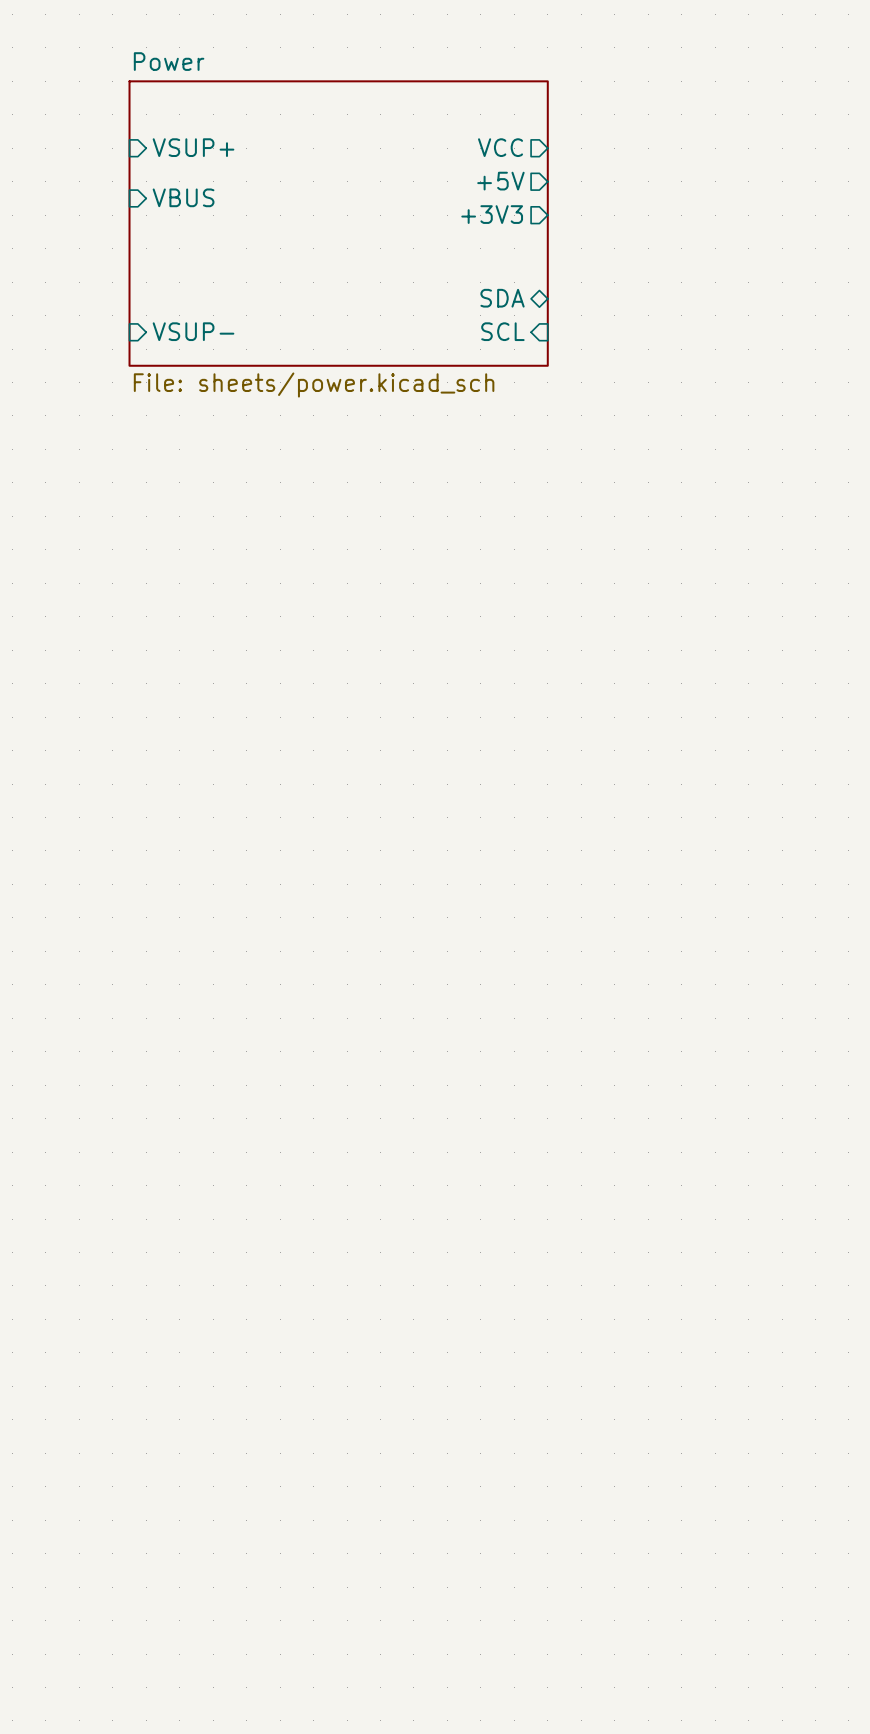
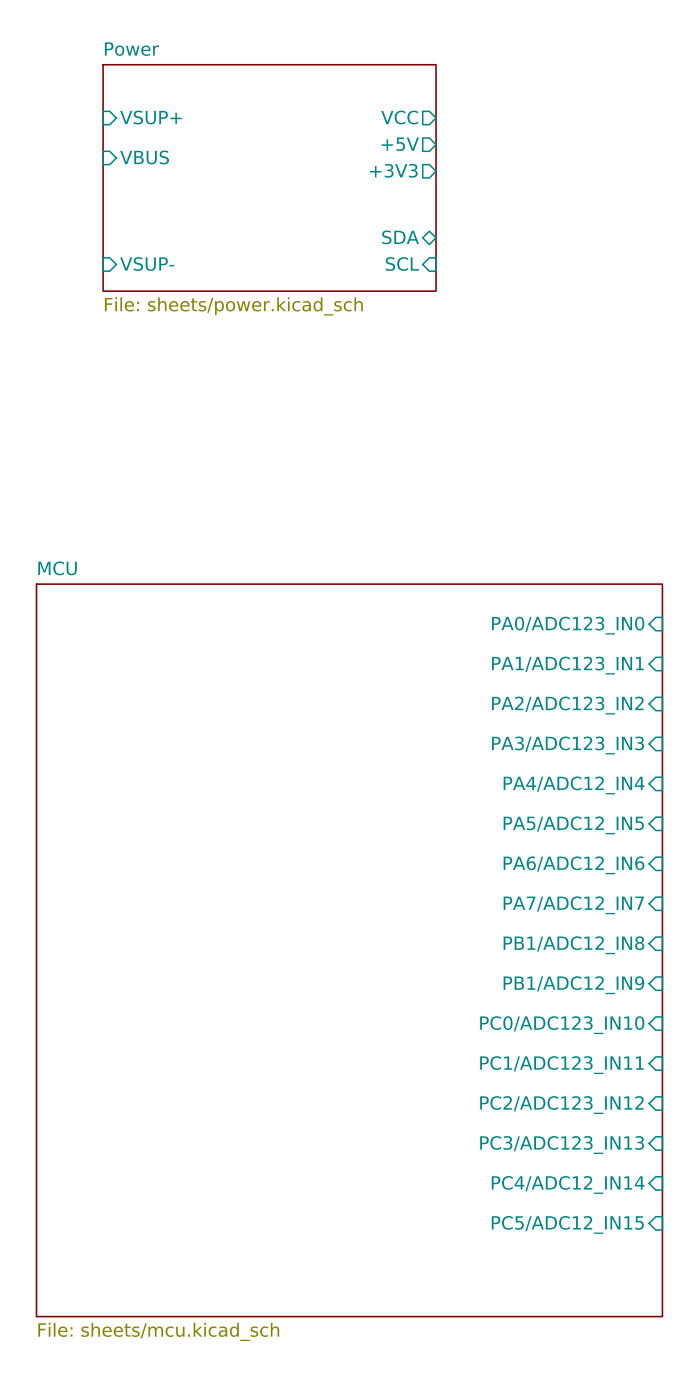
sheet pin: none -> PA0/ADC123_IN0 (568, 625)
sheet pin: none -> PA1/ADC123_IN1 (567, 665)
sheet pin: none -> PA2/ADC123_IN2 (567, 705)
sheet pin: none -> PA3/ADC123_IN3 (568, 745)
sheet pin: none -> PA4/ADC12_IN4 (574, 785)
sheet pin: none -> PA5/ADC12_IN5 (573, 825)
sheet pin: none -> PA6/ADC12_IN6 (574, 865)
sheet pin: none -> PA7/ADC12_IN7 (573, 905)
sheet pin: none -> PB1/ADC12_IN8 (573, 945)
sheet MCU: none -> File: sheets/mcu.kicad_sch (349, 950)
sheet pin: none -> PB1/ADC12_IN9 (573, 985)
sheet pin: none -> PC0/ADC123_IN10 (562, 1025)
sheet pin: none -> PC1/ADC123_IN11 (561, 1065)
sheet pin: none -> PC2/ADC123_IN12 (561, 1105)
sheet pin: none -> PC3/ADC123_IN13 (562, 1145)
sheet pin: none -> PC4/ADC12_IN14 (568, 1184)
sheet pin: none -> PC5/ADC12_IN15 (567, 1224)

